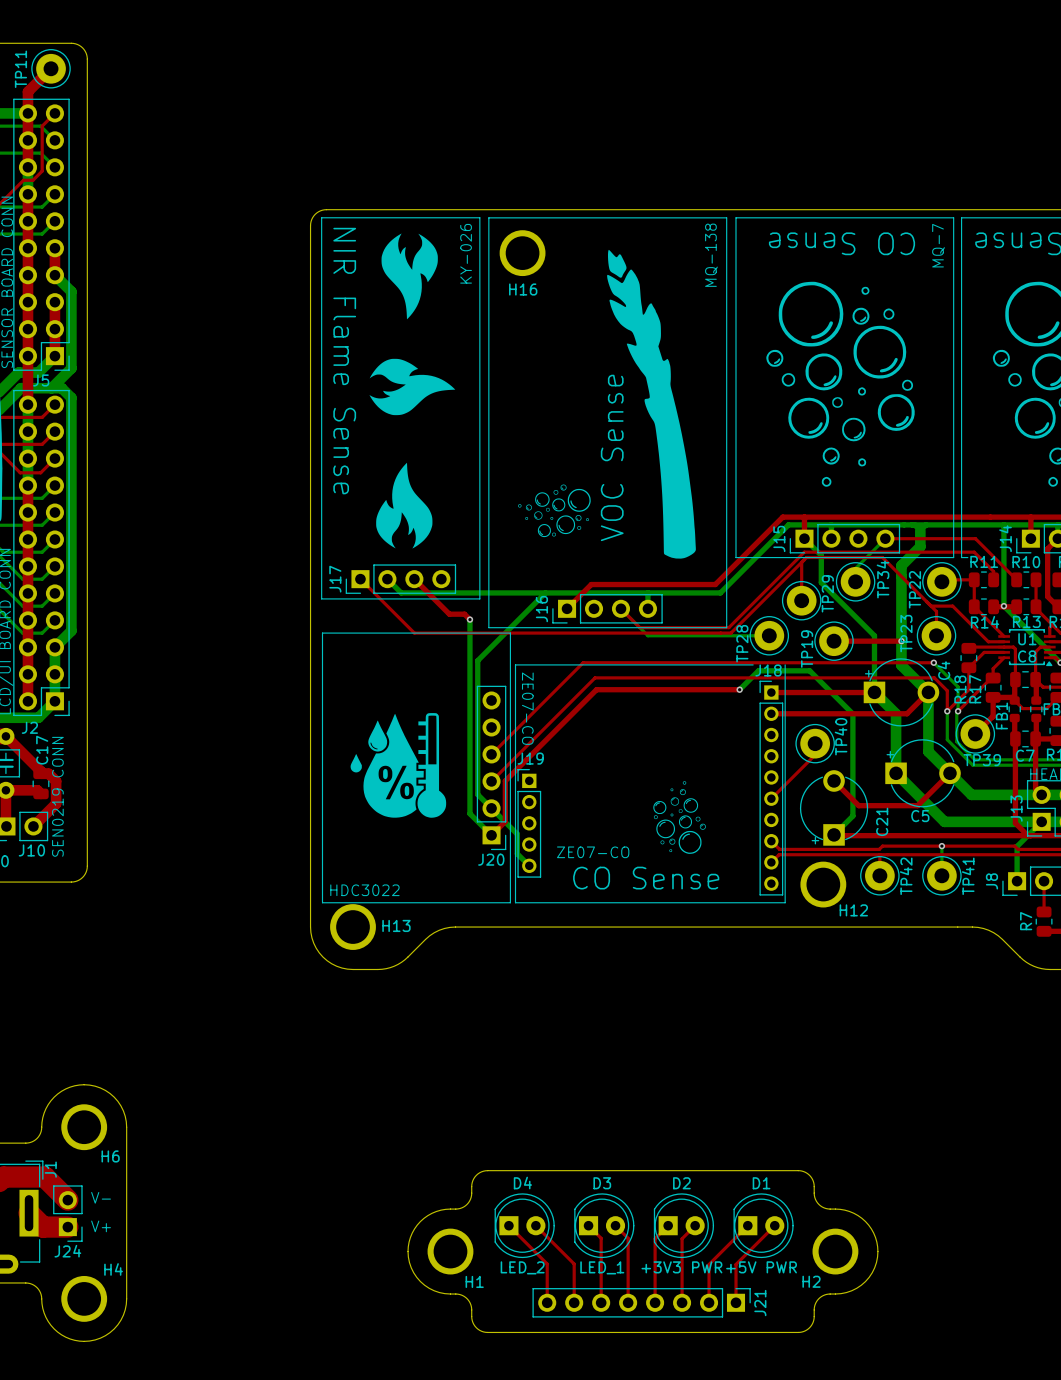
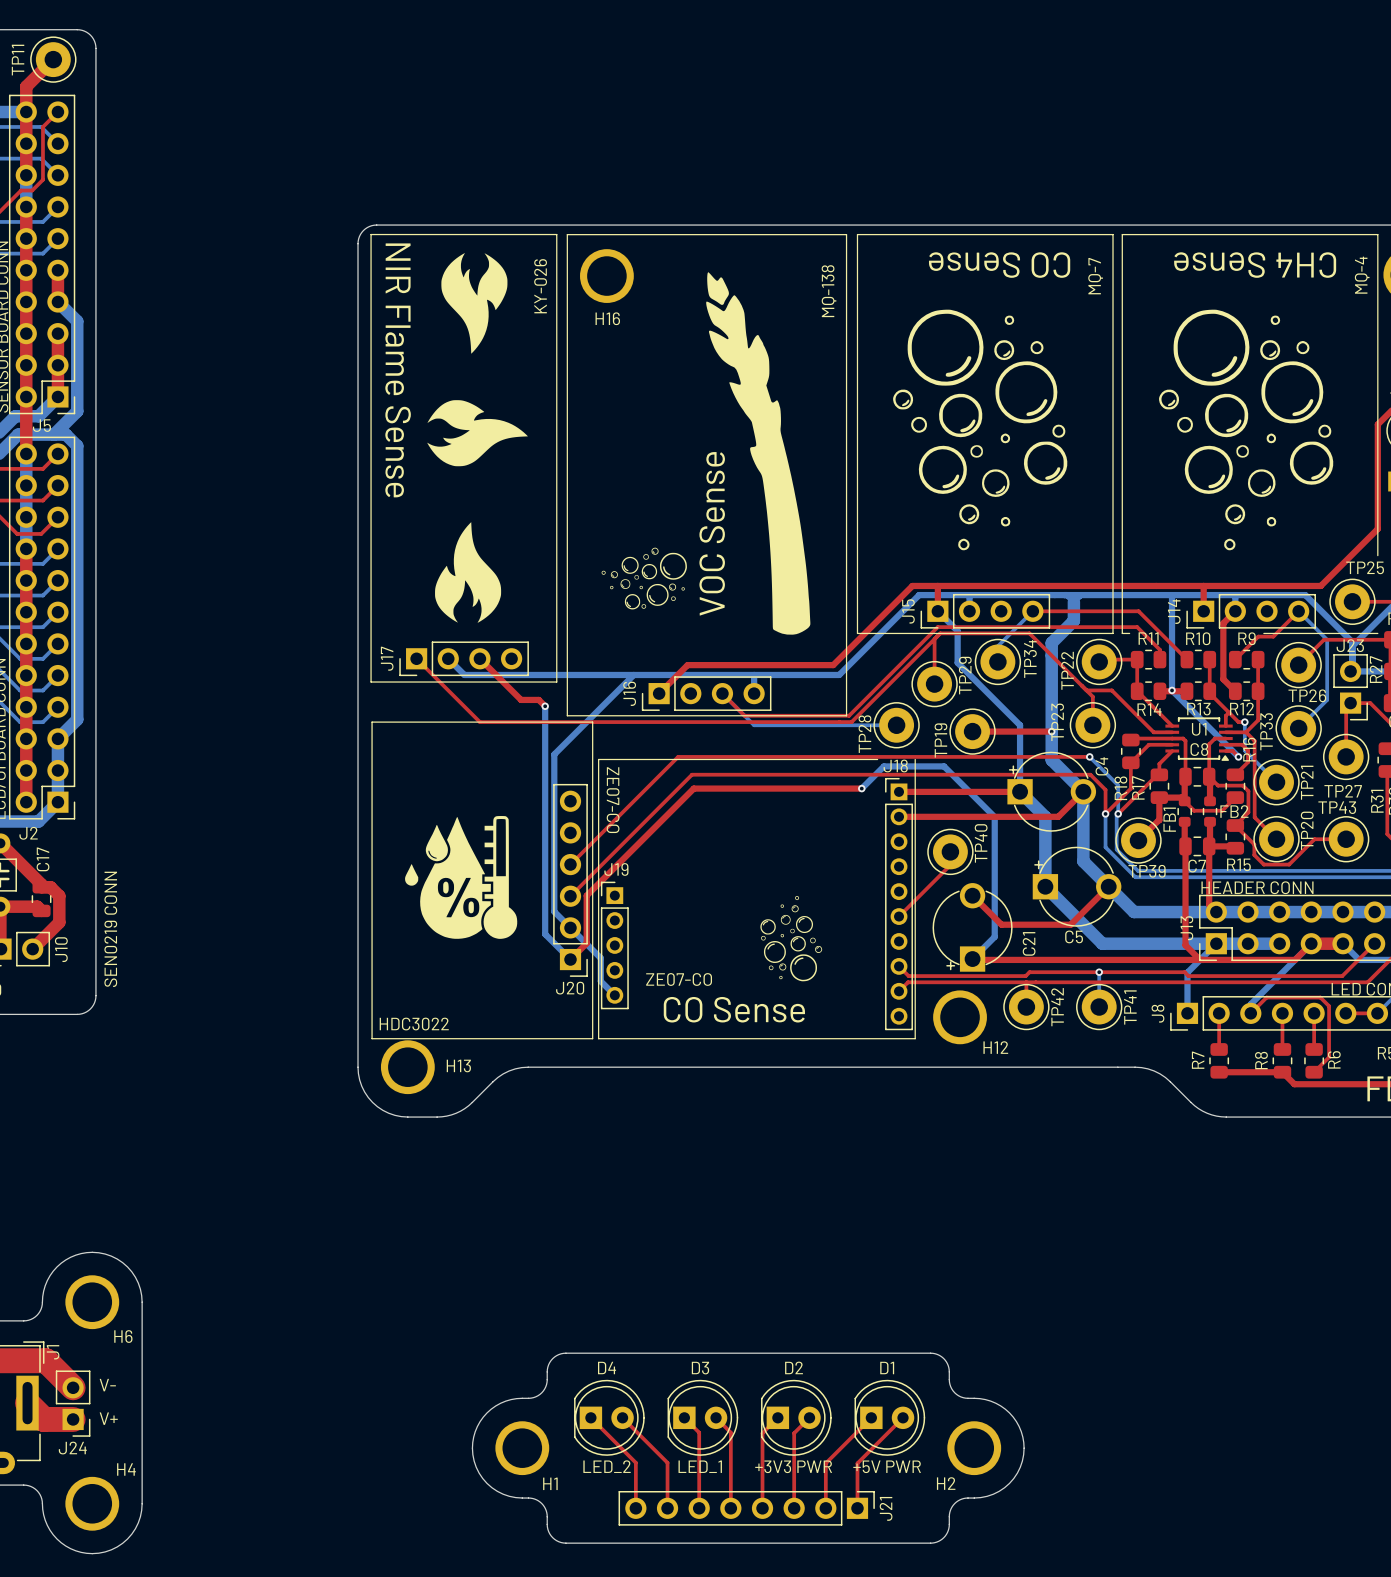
text position: SEN0219 CONN (57, 796) -> SEN0219 CONN (110, 929)
J10 name rotation: 0° (31, 850) -> 90° counterclockwise (61, 949)
J10 name position: J10 (31, 850) -> J10 (61, 949)

